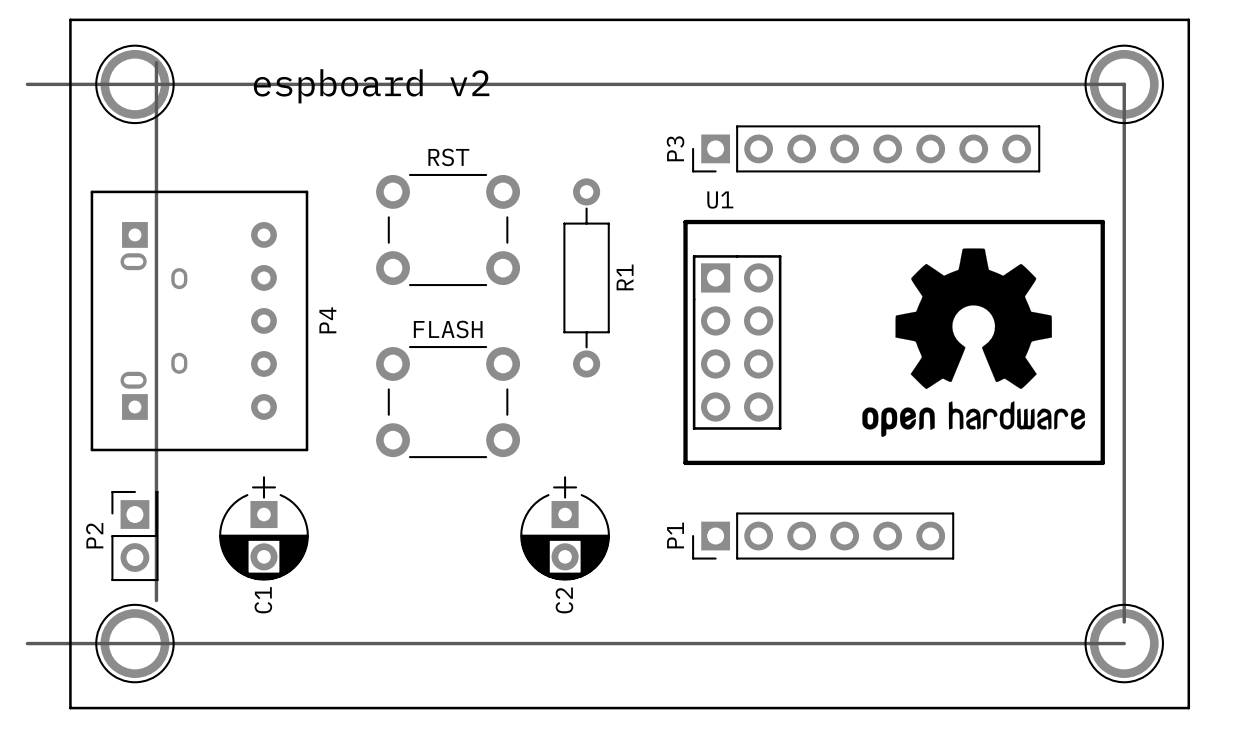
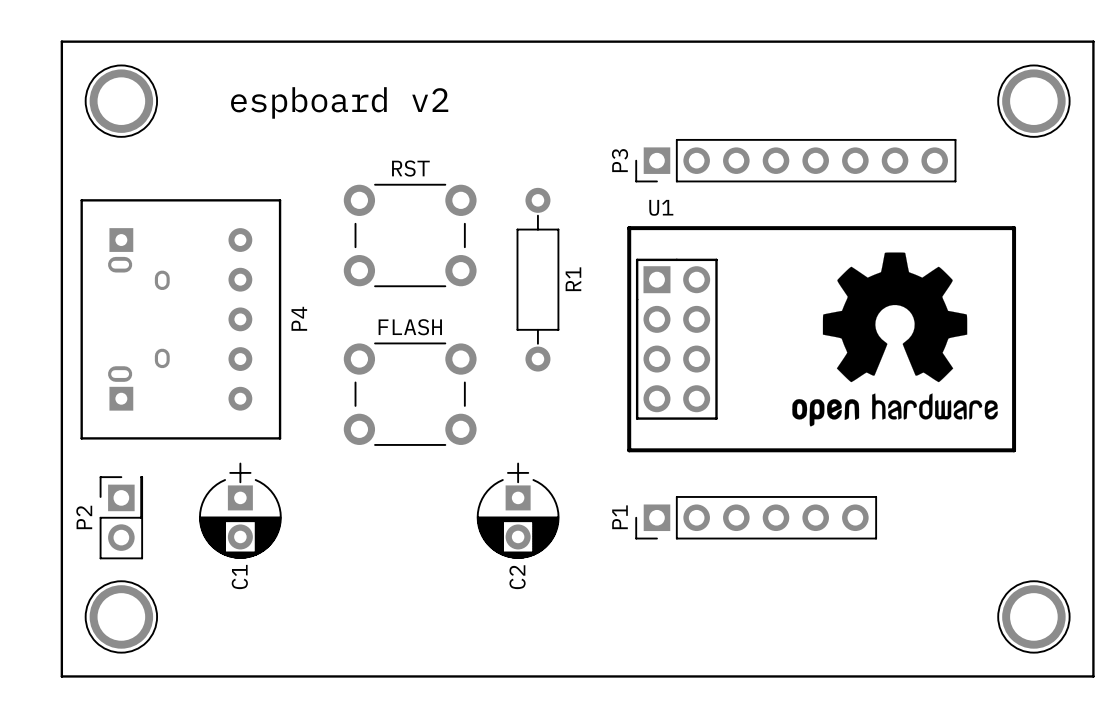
line: (156, 62) (156, 600) -> none
line: (27, 84) (1124, 84) (1124, 622) -> none
line: (27, 643) (1124, 643) -> none

